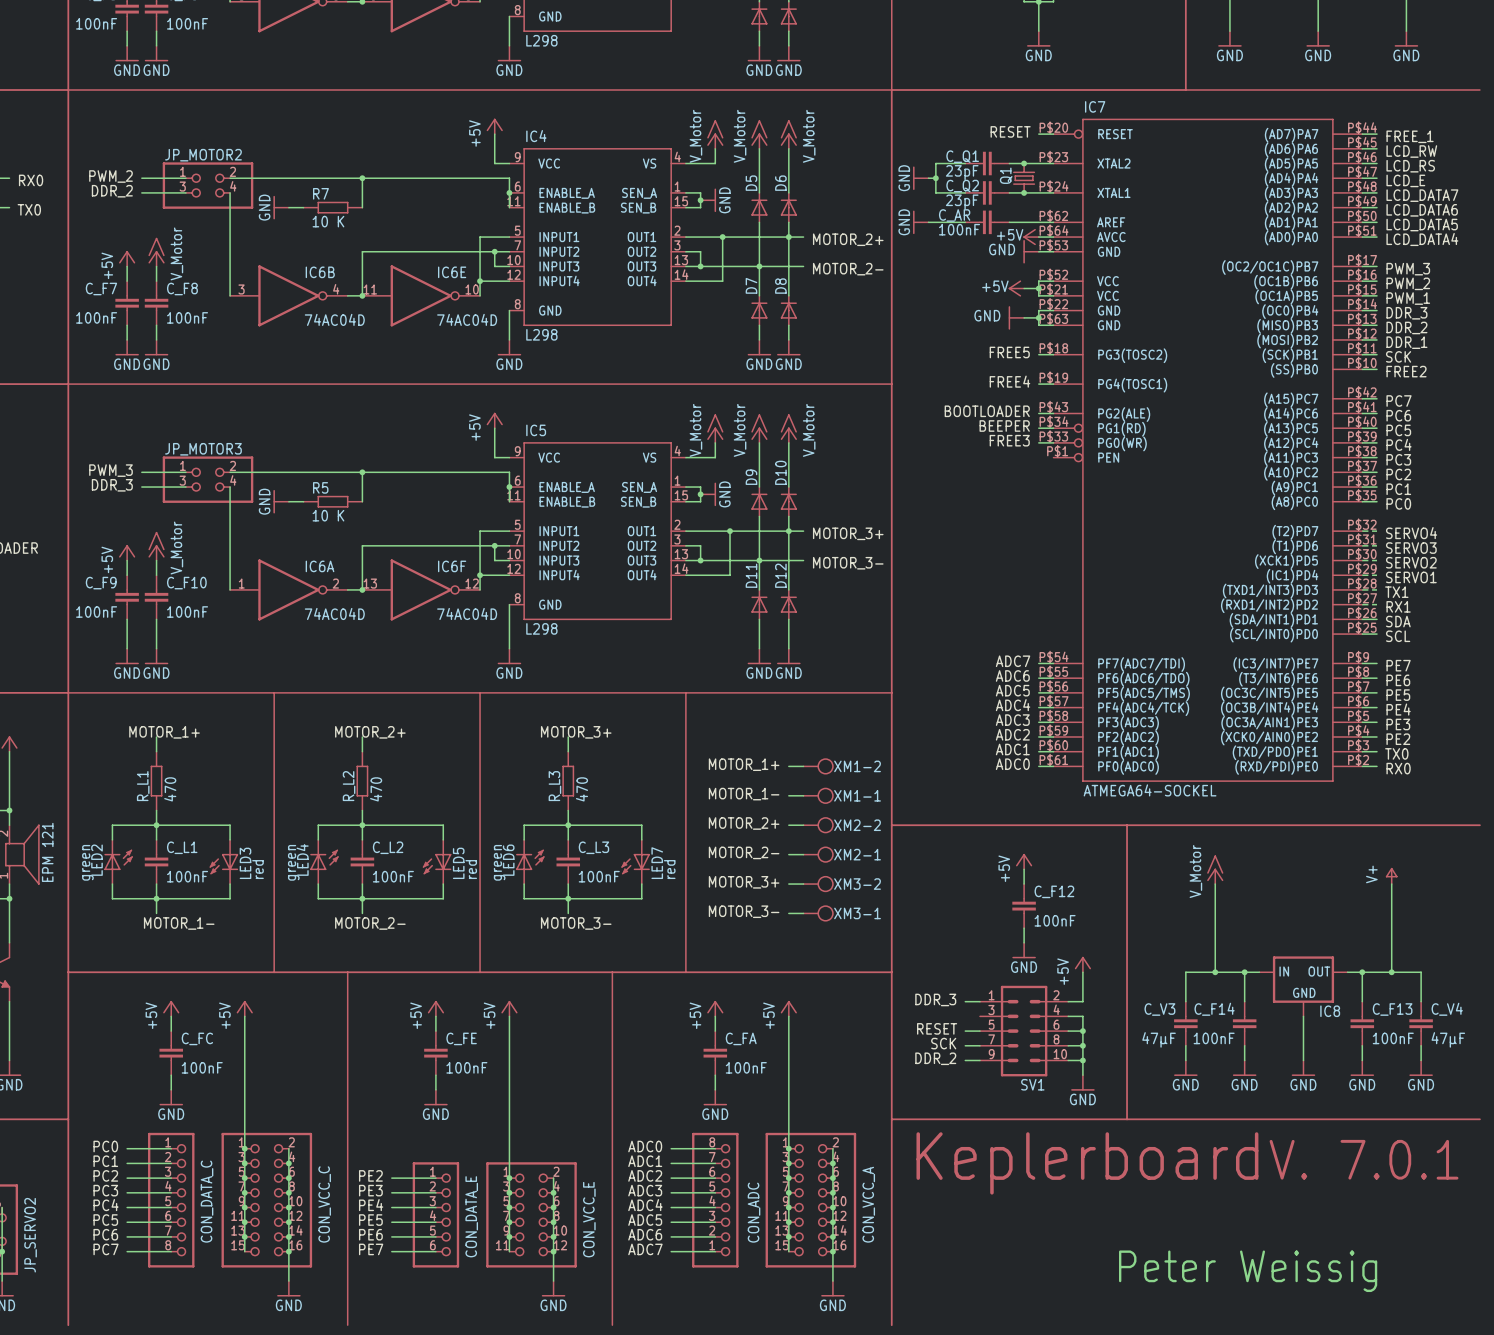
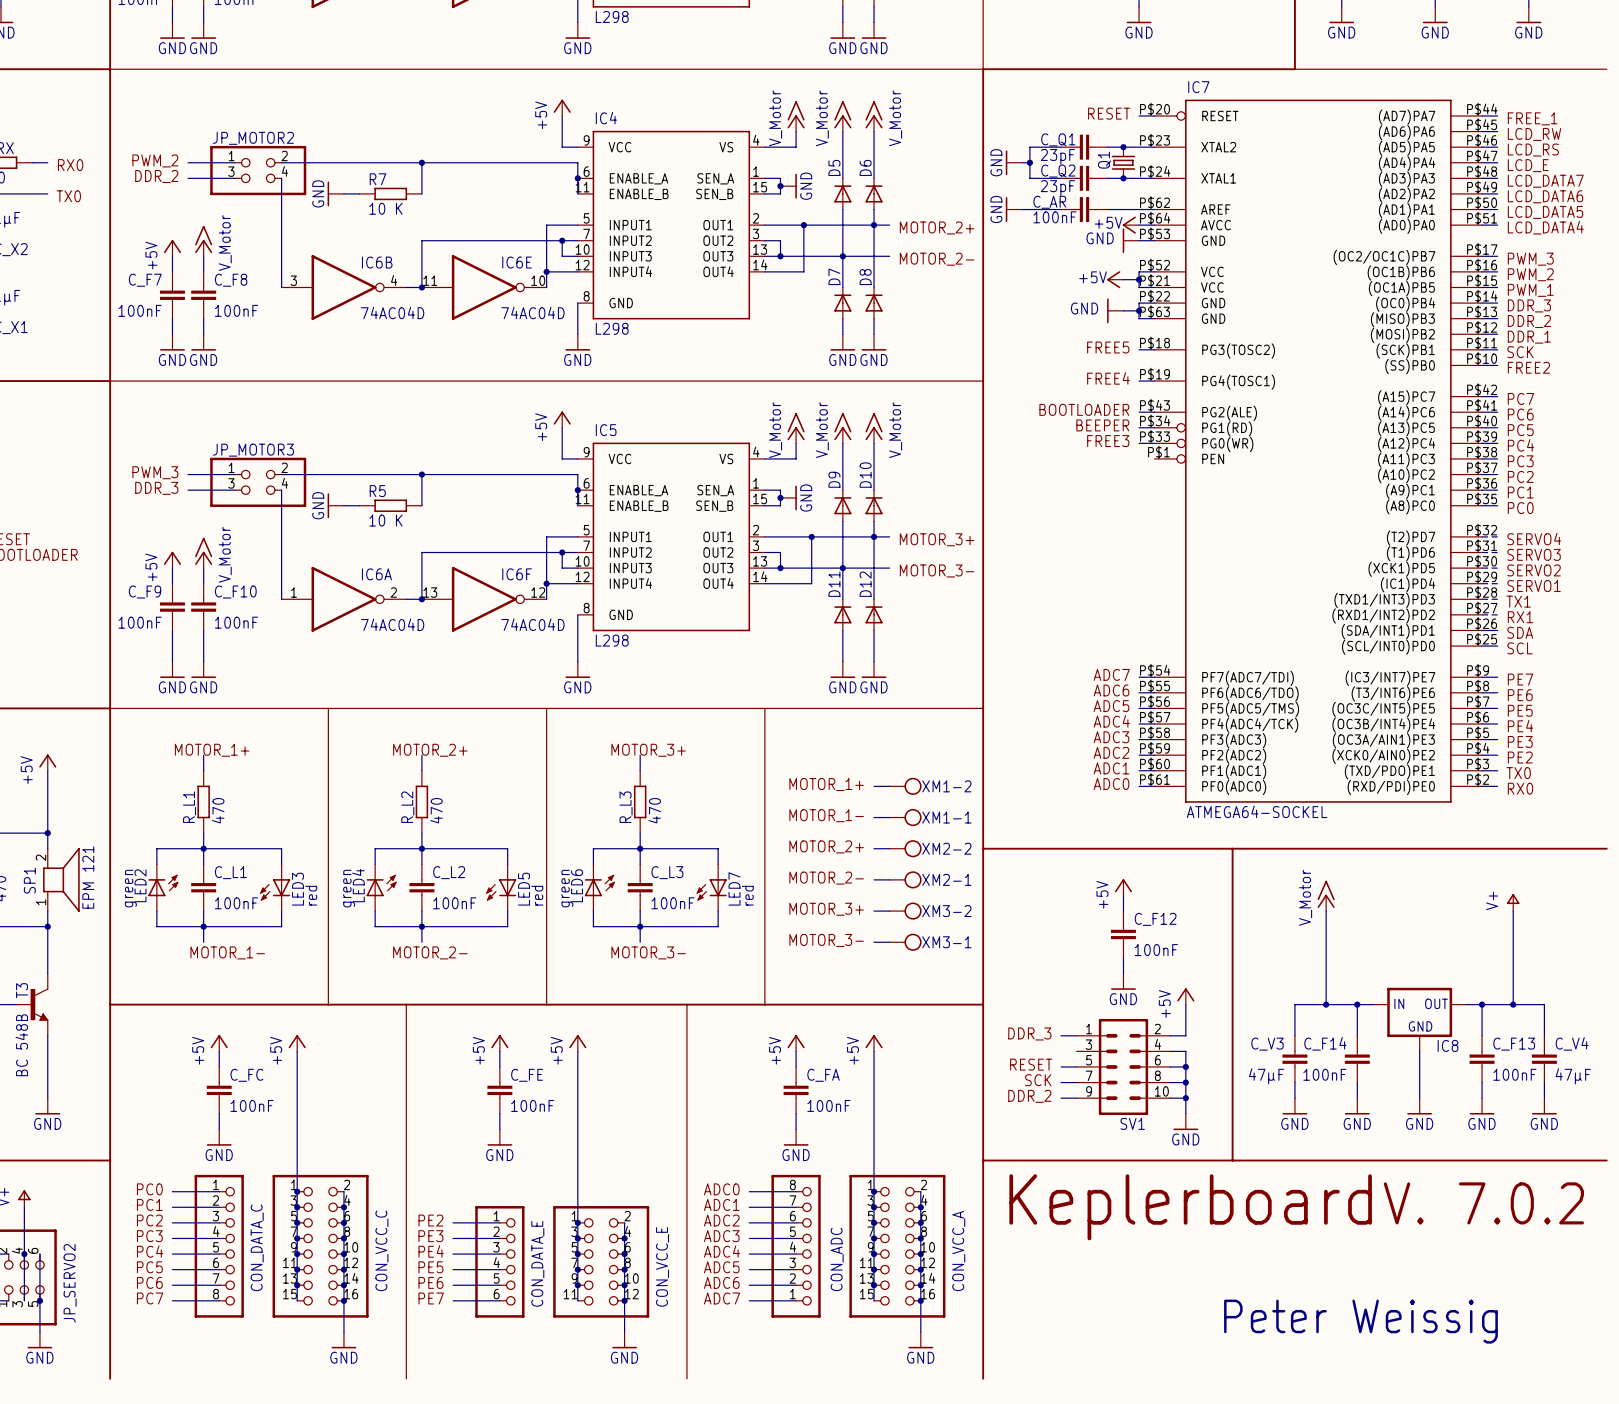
text: V. 7.0.1 (1364, 1159) -> V. 7.0.2 (1483, 1203)

